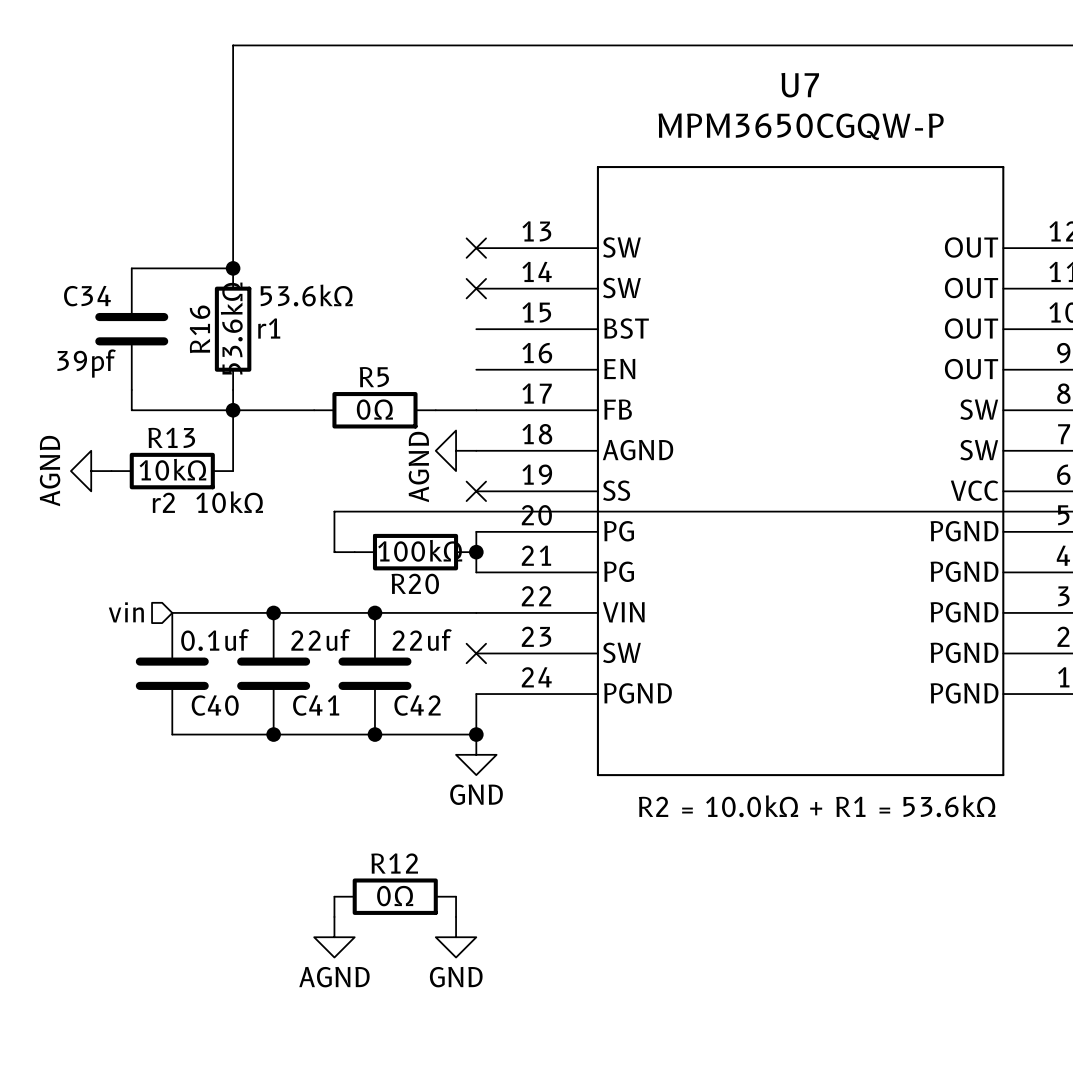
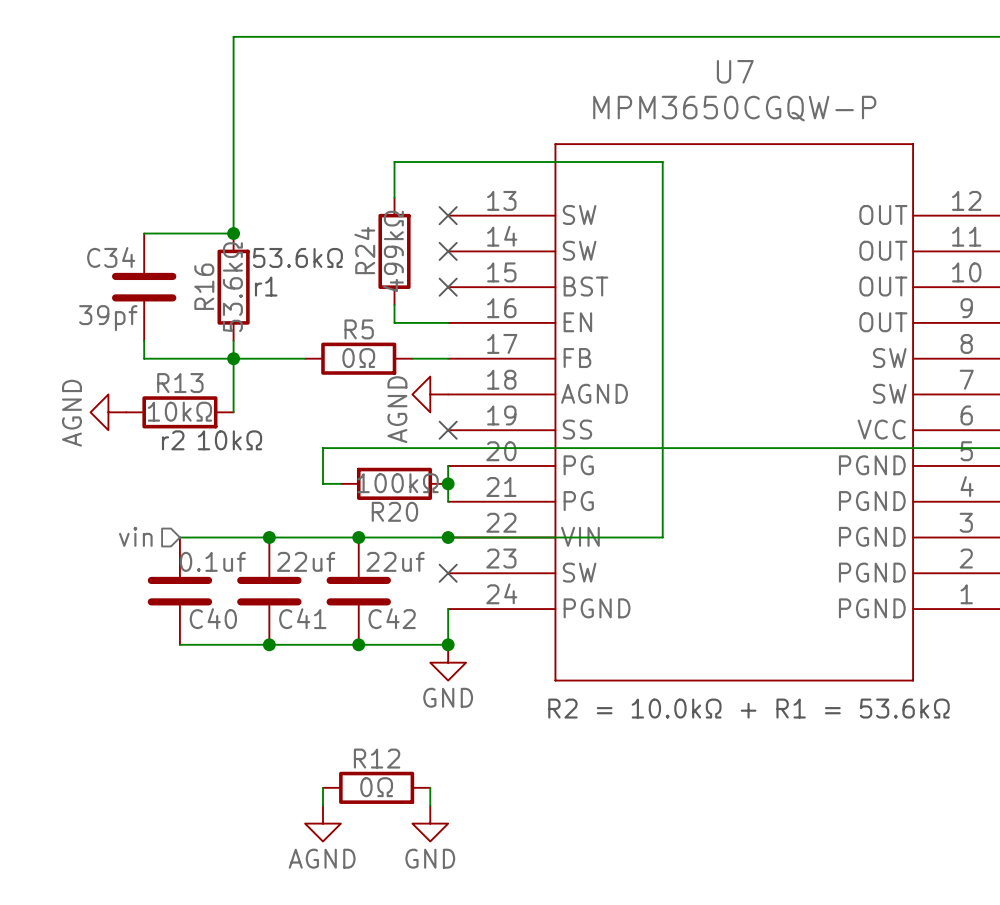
wire: none -> (394, 197) (394, 162) (662, 162) (662, 537) (448, 537)
R24: none -> 499kΩ (394, 251)
no-connect mark: none -> (448, 287)
wire: none -> (394, 305) (394, 322) (448, 322)
junction: none -> (448, 537)

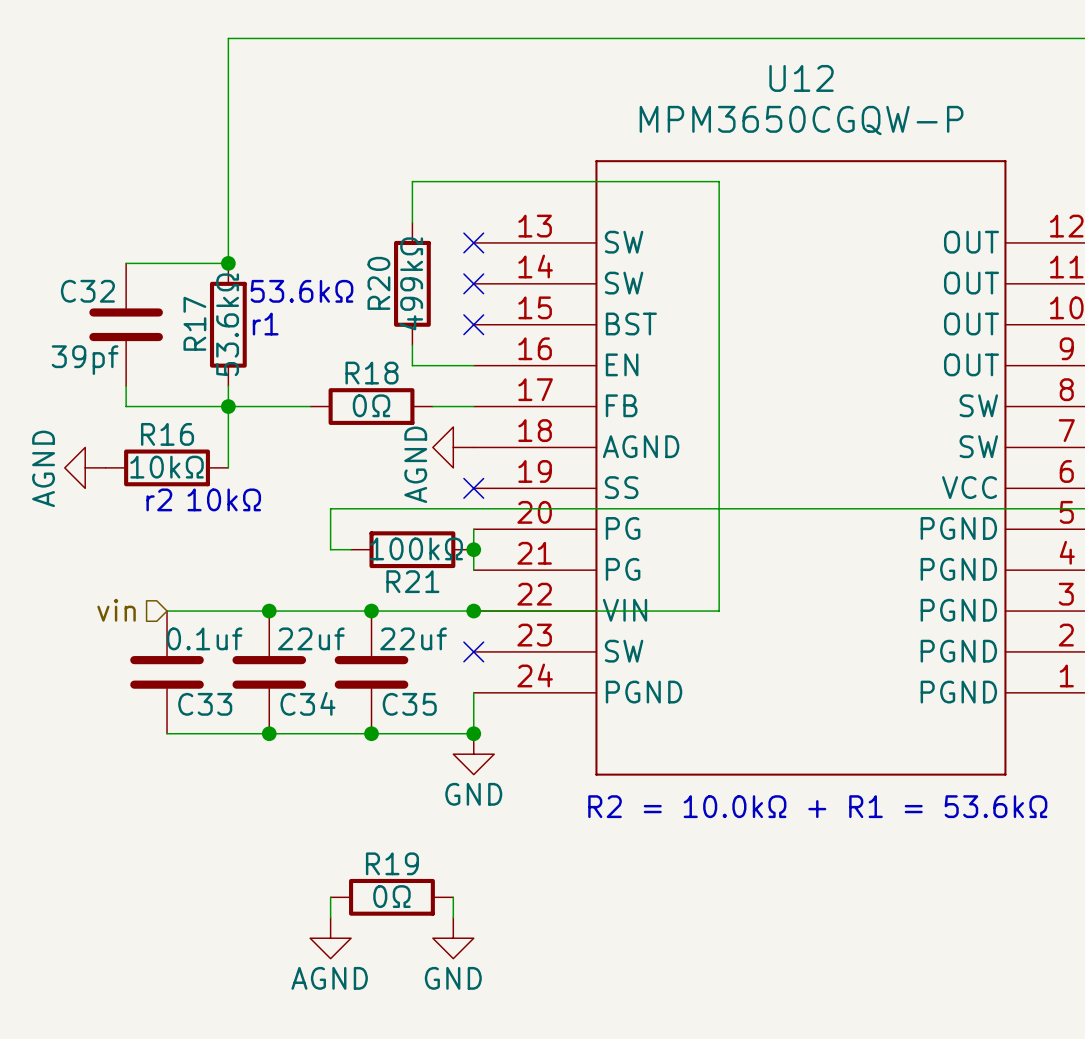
U7 name: U7 (735, 71) -> U12 (801, 78)
R24 name: R24 (364, 250) -> R20 (378, 283)
C34 name: C34 (111, 257) -> C32 (87, 291)
R16 name: R16 (204, 286) -> R17 (194, 323)
R5 name: R5 (359, 329) -> R18 (372, 373)
R13 name: R13 (180, 383) -> R16 (167, 434)
R20 name: R20 (394, 511) -> R21 (412, 581)
C40 name: C40 (213, 618) -> C33 (205, 704)
C41 name: C41 (302, 618) -> C34 (307, 703)
C42 name: C42 (392, 618) -> C35 (409, 704)
R12 name: R12 (377, 758) -> R19 (392, 863)

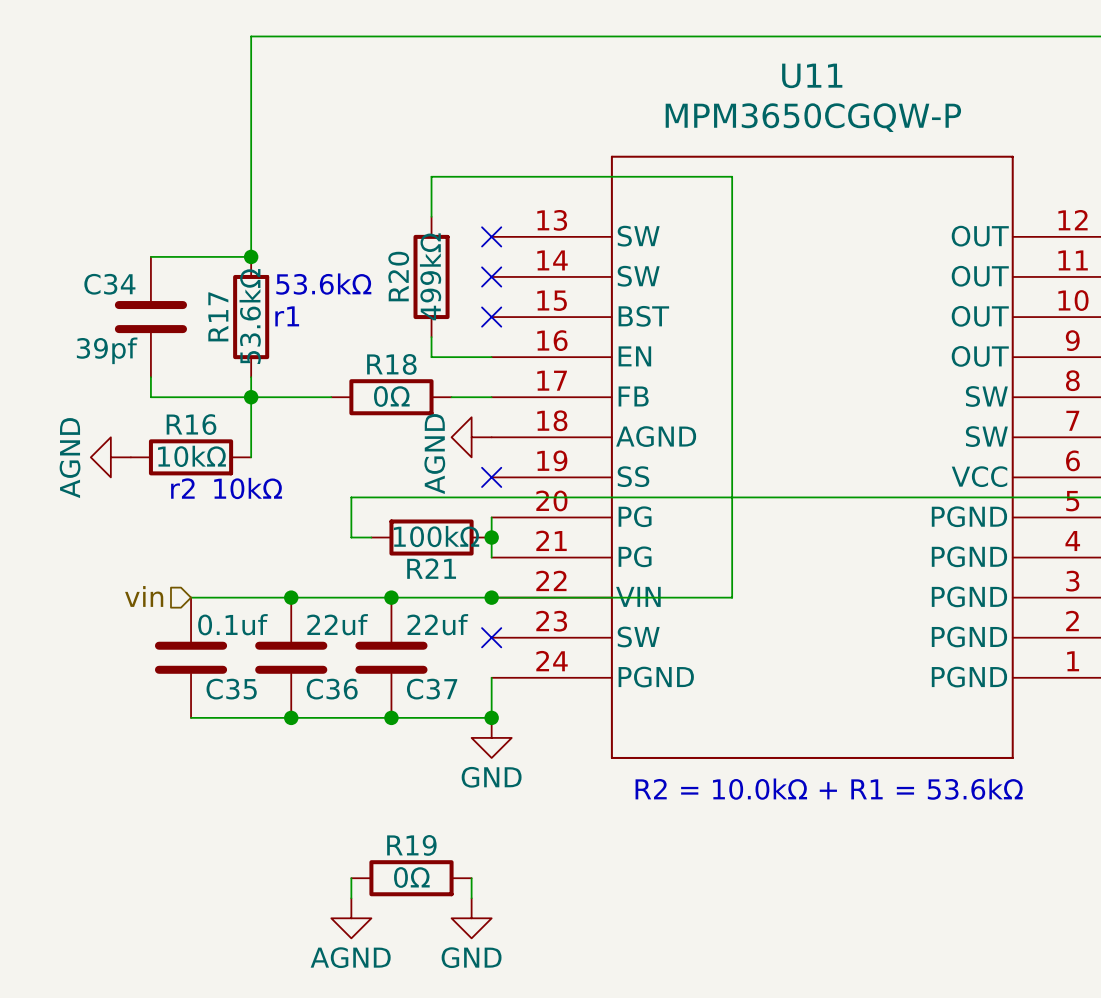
U12 name: U12 (801, 78) -> U11 (812, 75)
C32 name: C32 (87, 291) -> C34 (109, 284)
C34 name: C34 (307, 703) -> C36 (332, 689)
C33 name: C33 (205, 704) -> C35 (231, 689)
C35 name: C35 (409, 704) -> C37 (432, 689)

